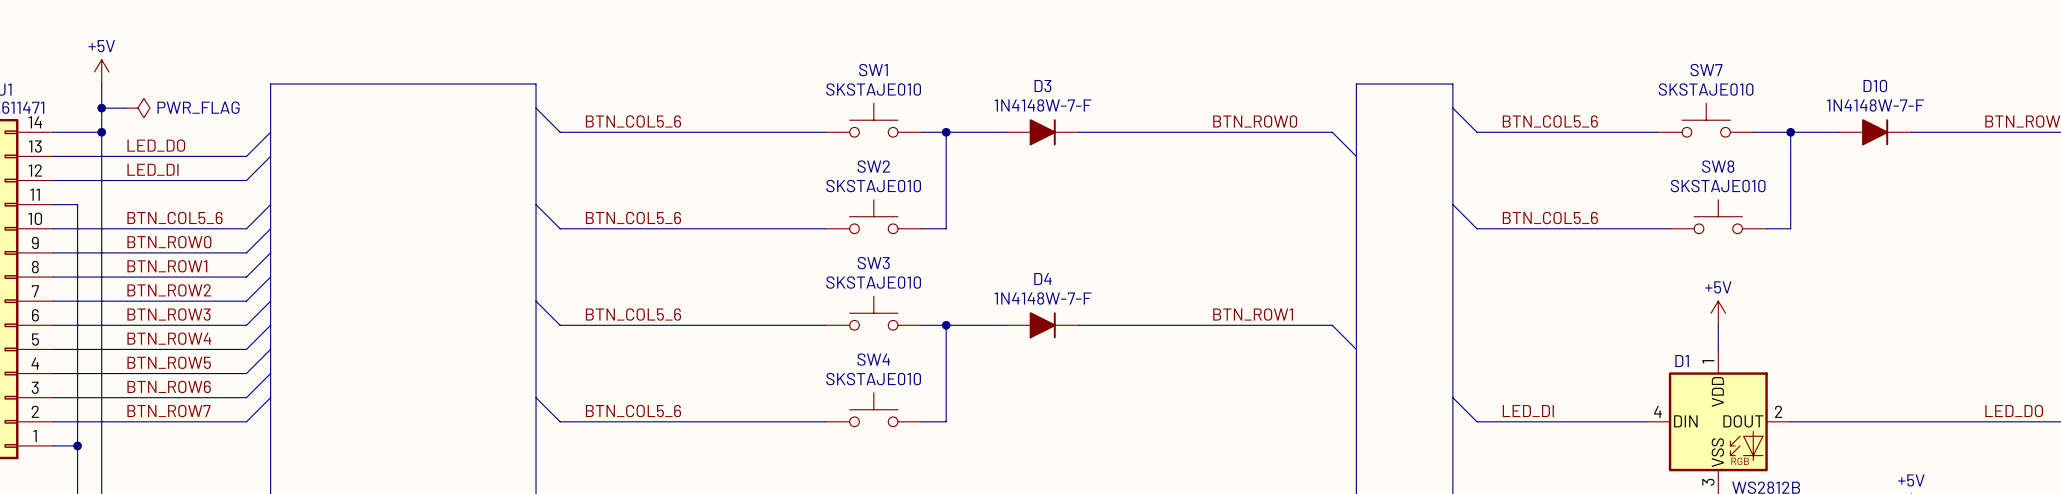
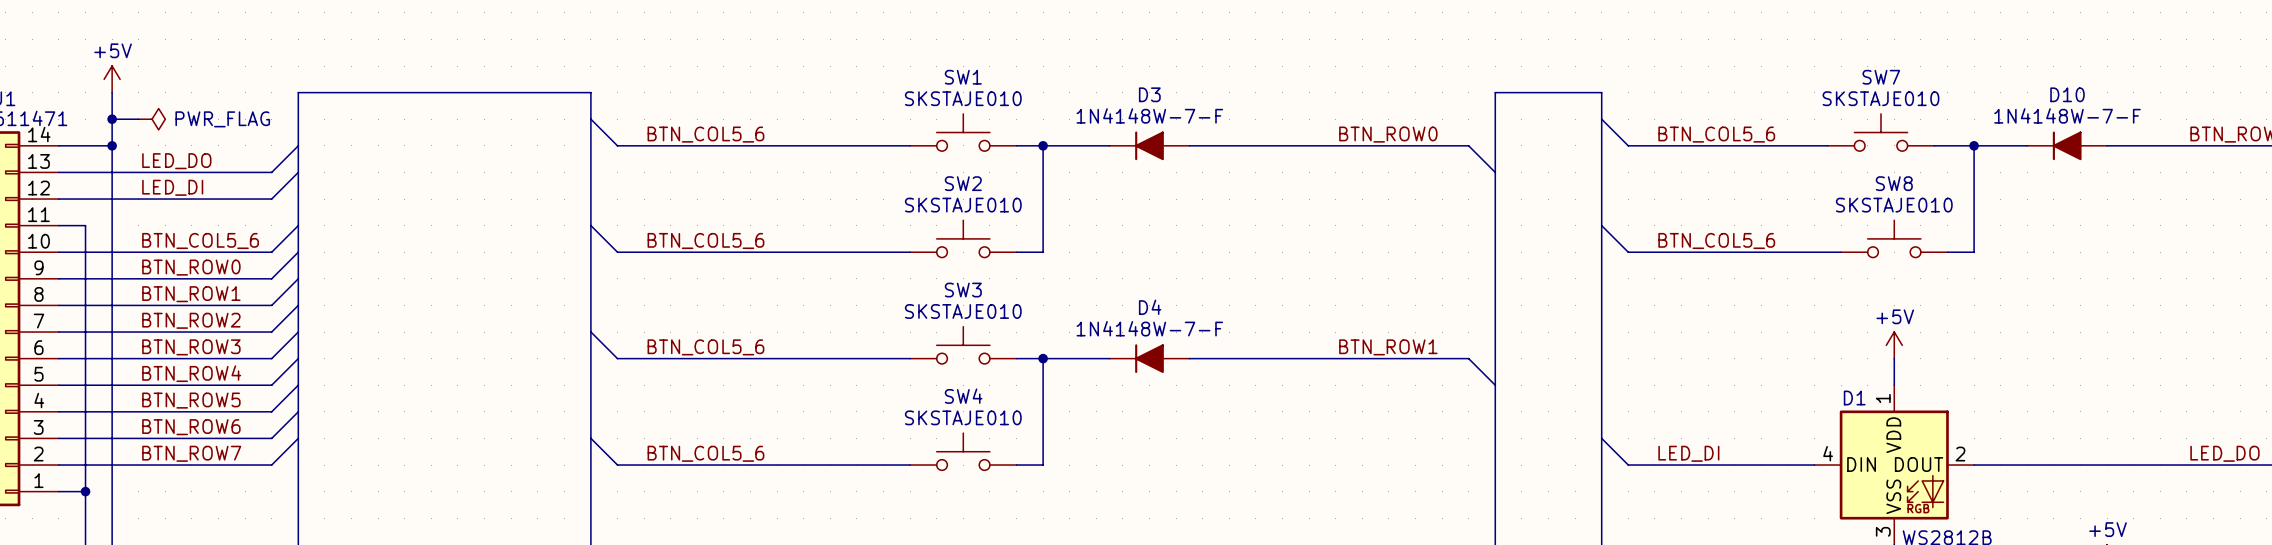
D3 rotation: 0° (1042, 132) -> 180° (1149, 145)
D10 rotation: 0° (1875, 132) -> 180° (2067, 145)
D4 rotation: 0° (1042, 325) -> 180° (1149, 358)

